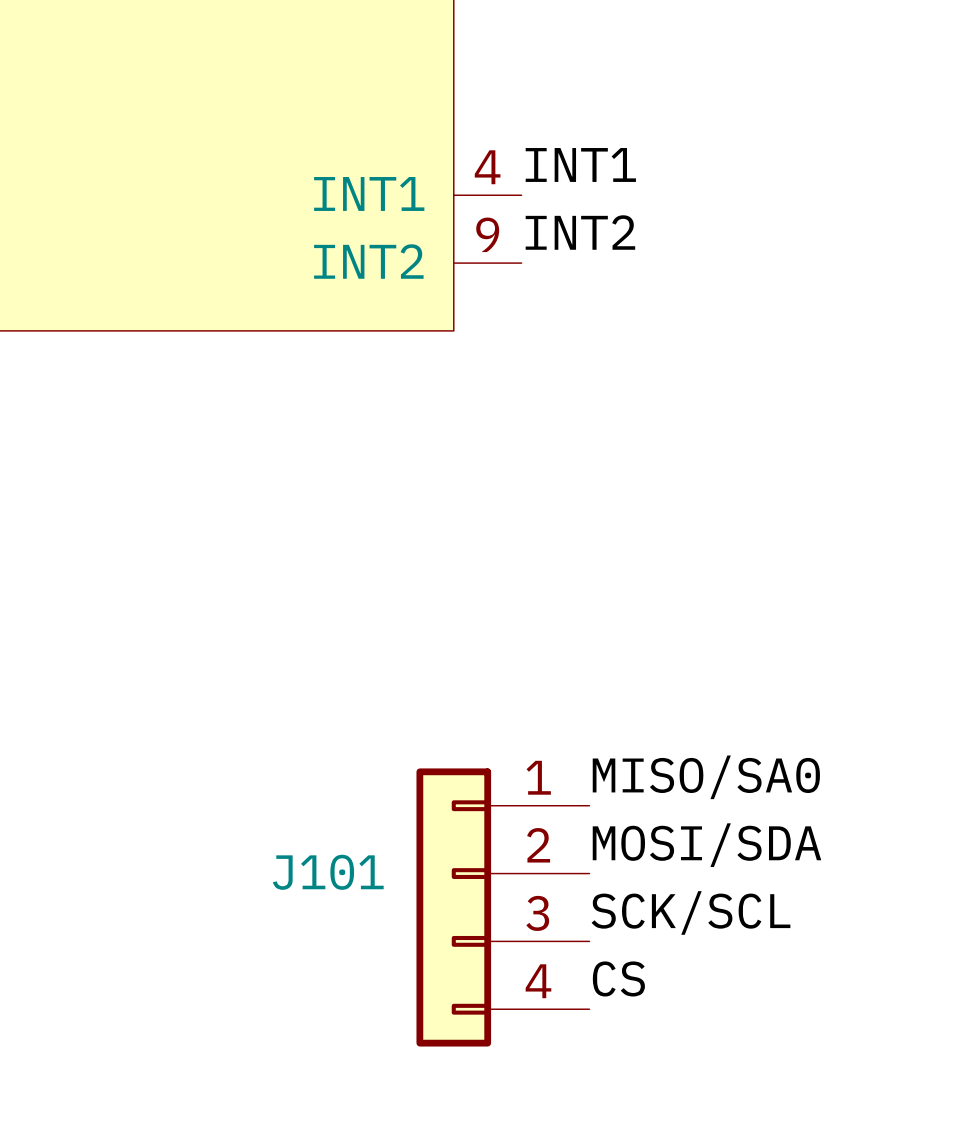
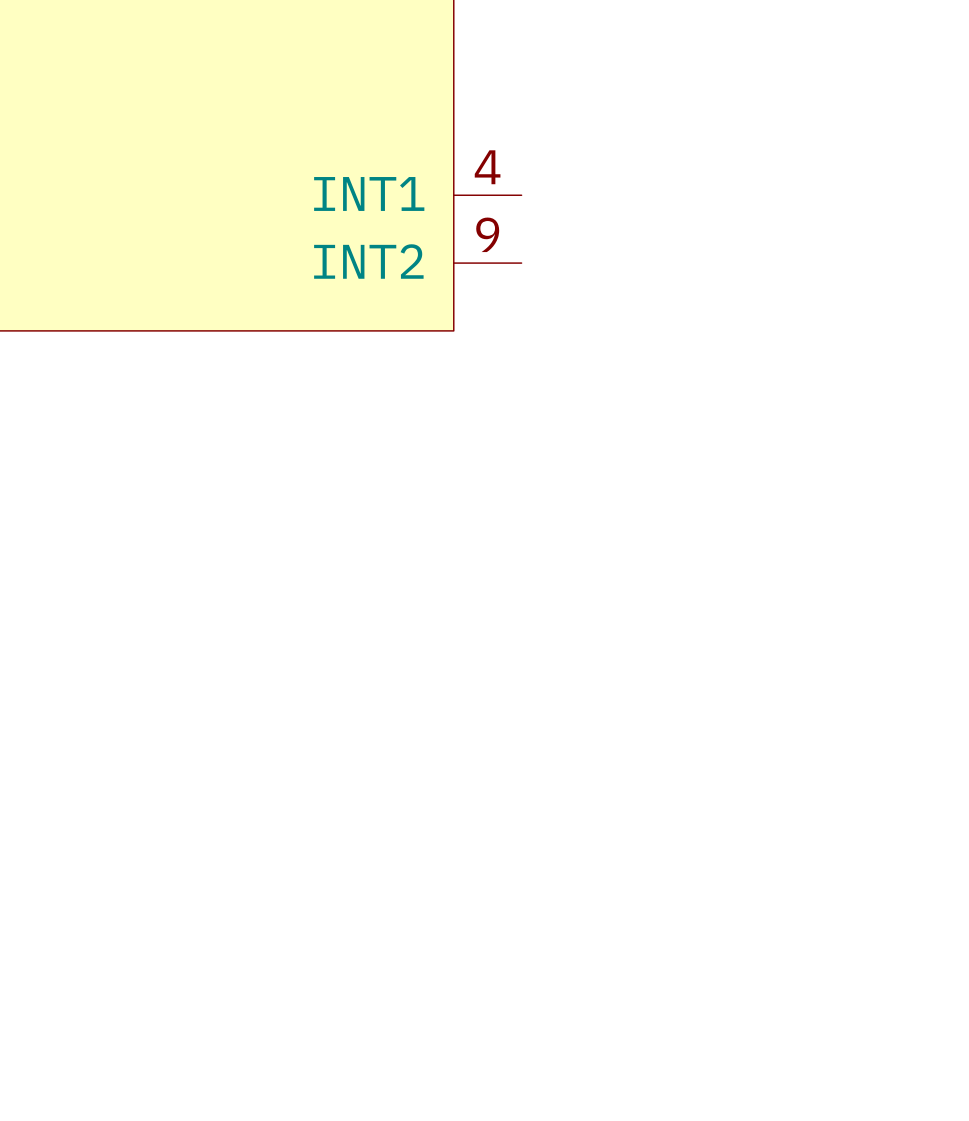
label: INT1 (580, 164) -> none
label: INT2 (580, 232) -> none
label: MISO/SA0 (706, 777) -> none
label: MOSI/SDA (706, 845) -> none
J101: (502, 907) -> none
label: SCK/SCL (691, 912) -> none
label: CS (618, 978) -> none

